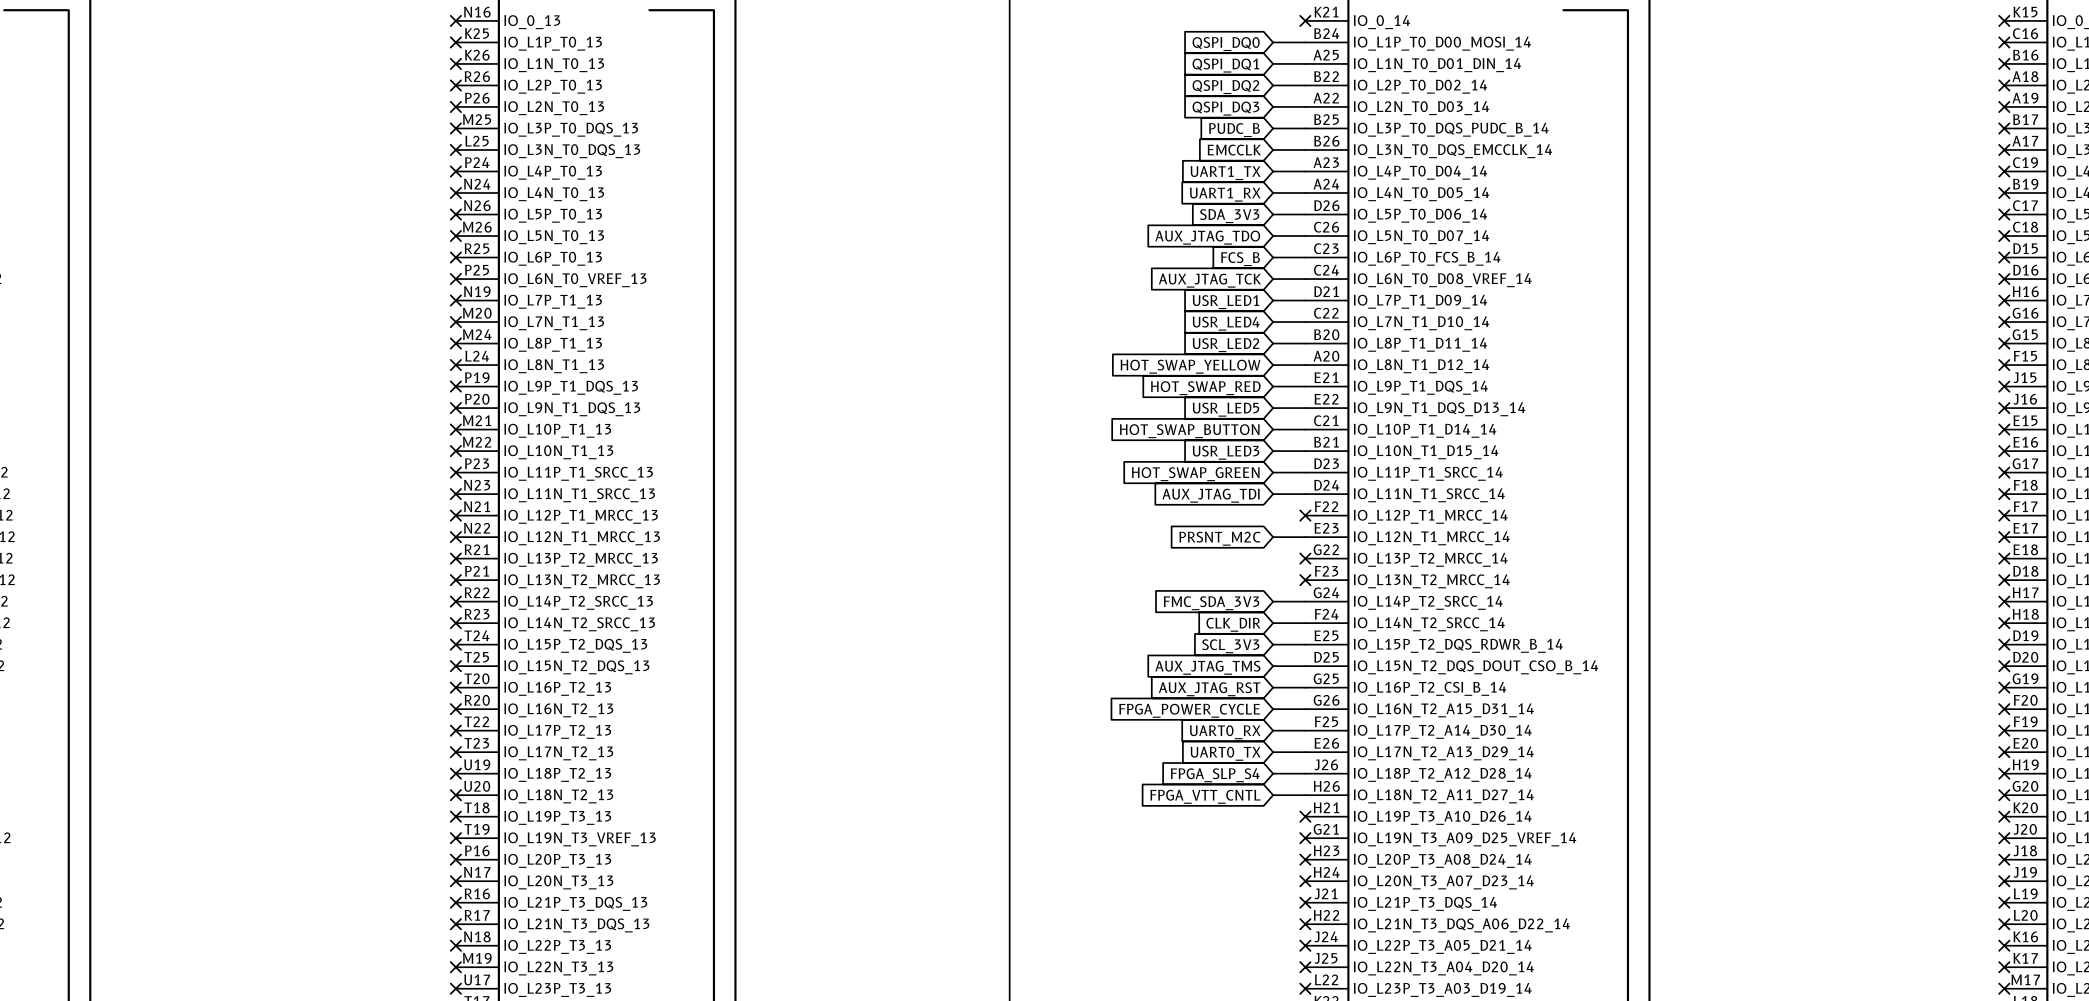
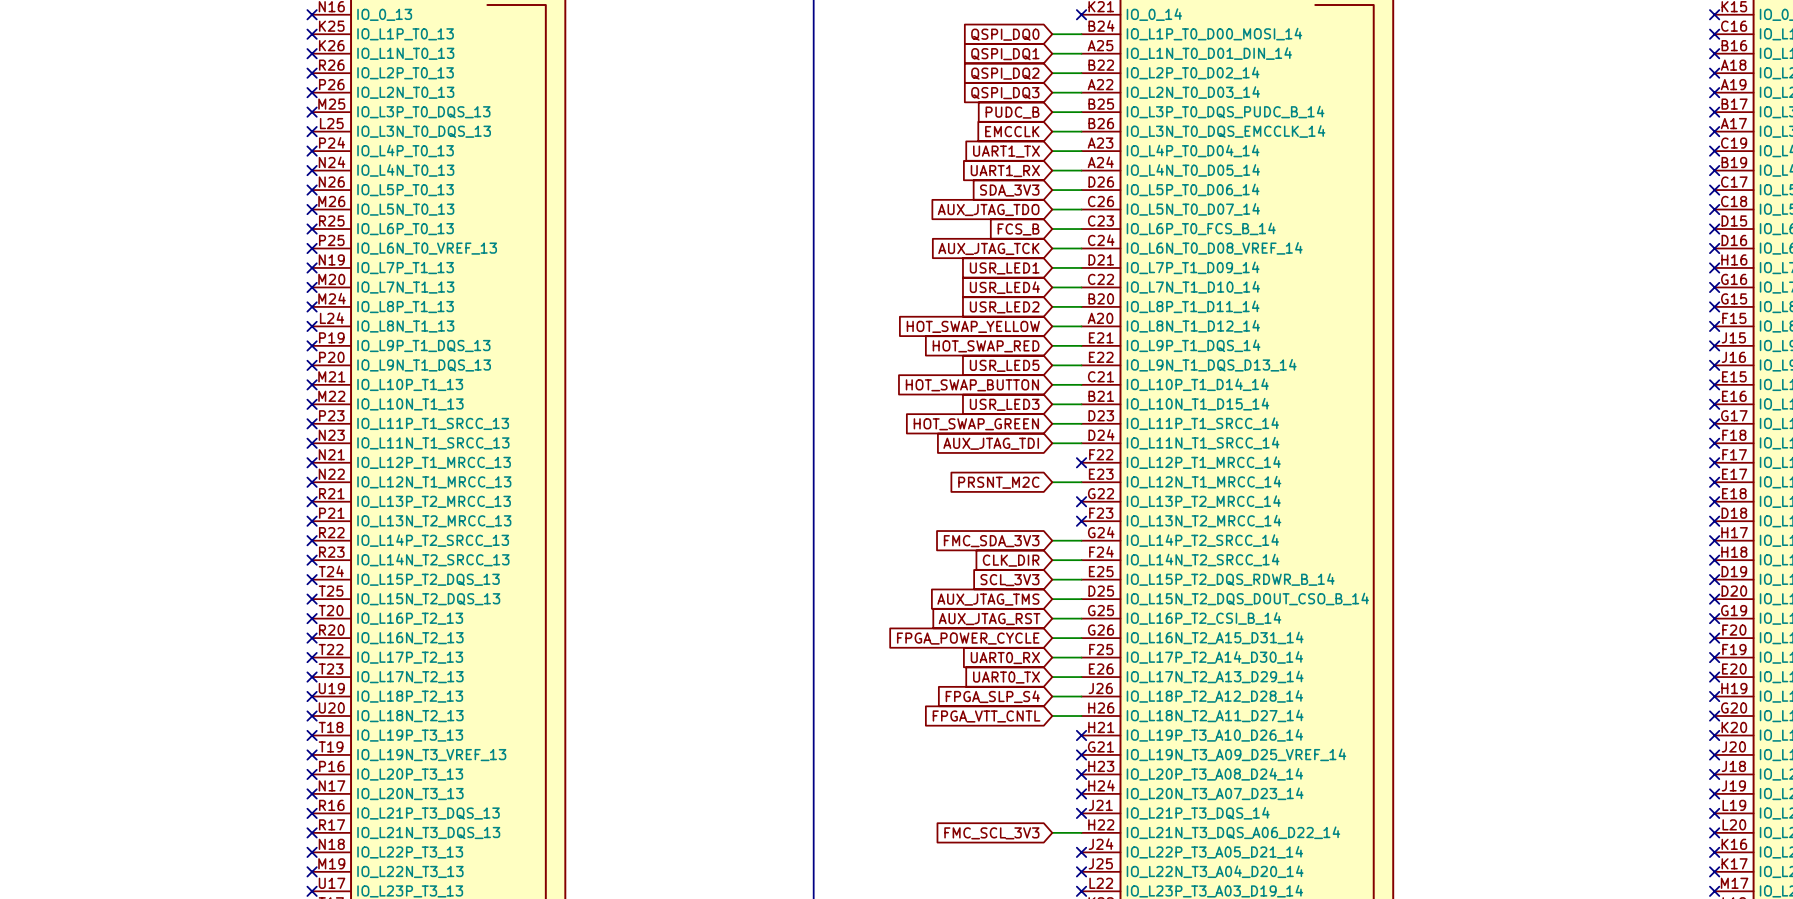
wire: none -> (1052, 832) (1081, 832)
no-connect mark: (1305, 924) -> none
global label: none -> FMC_SCL_3V3 (991, 833)

